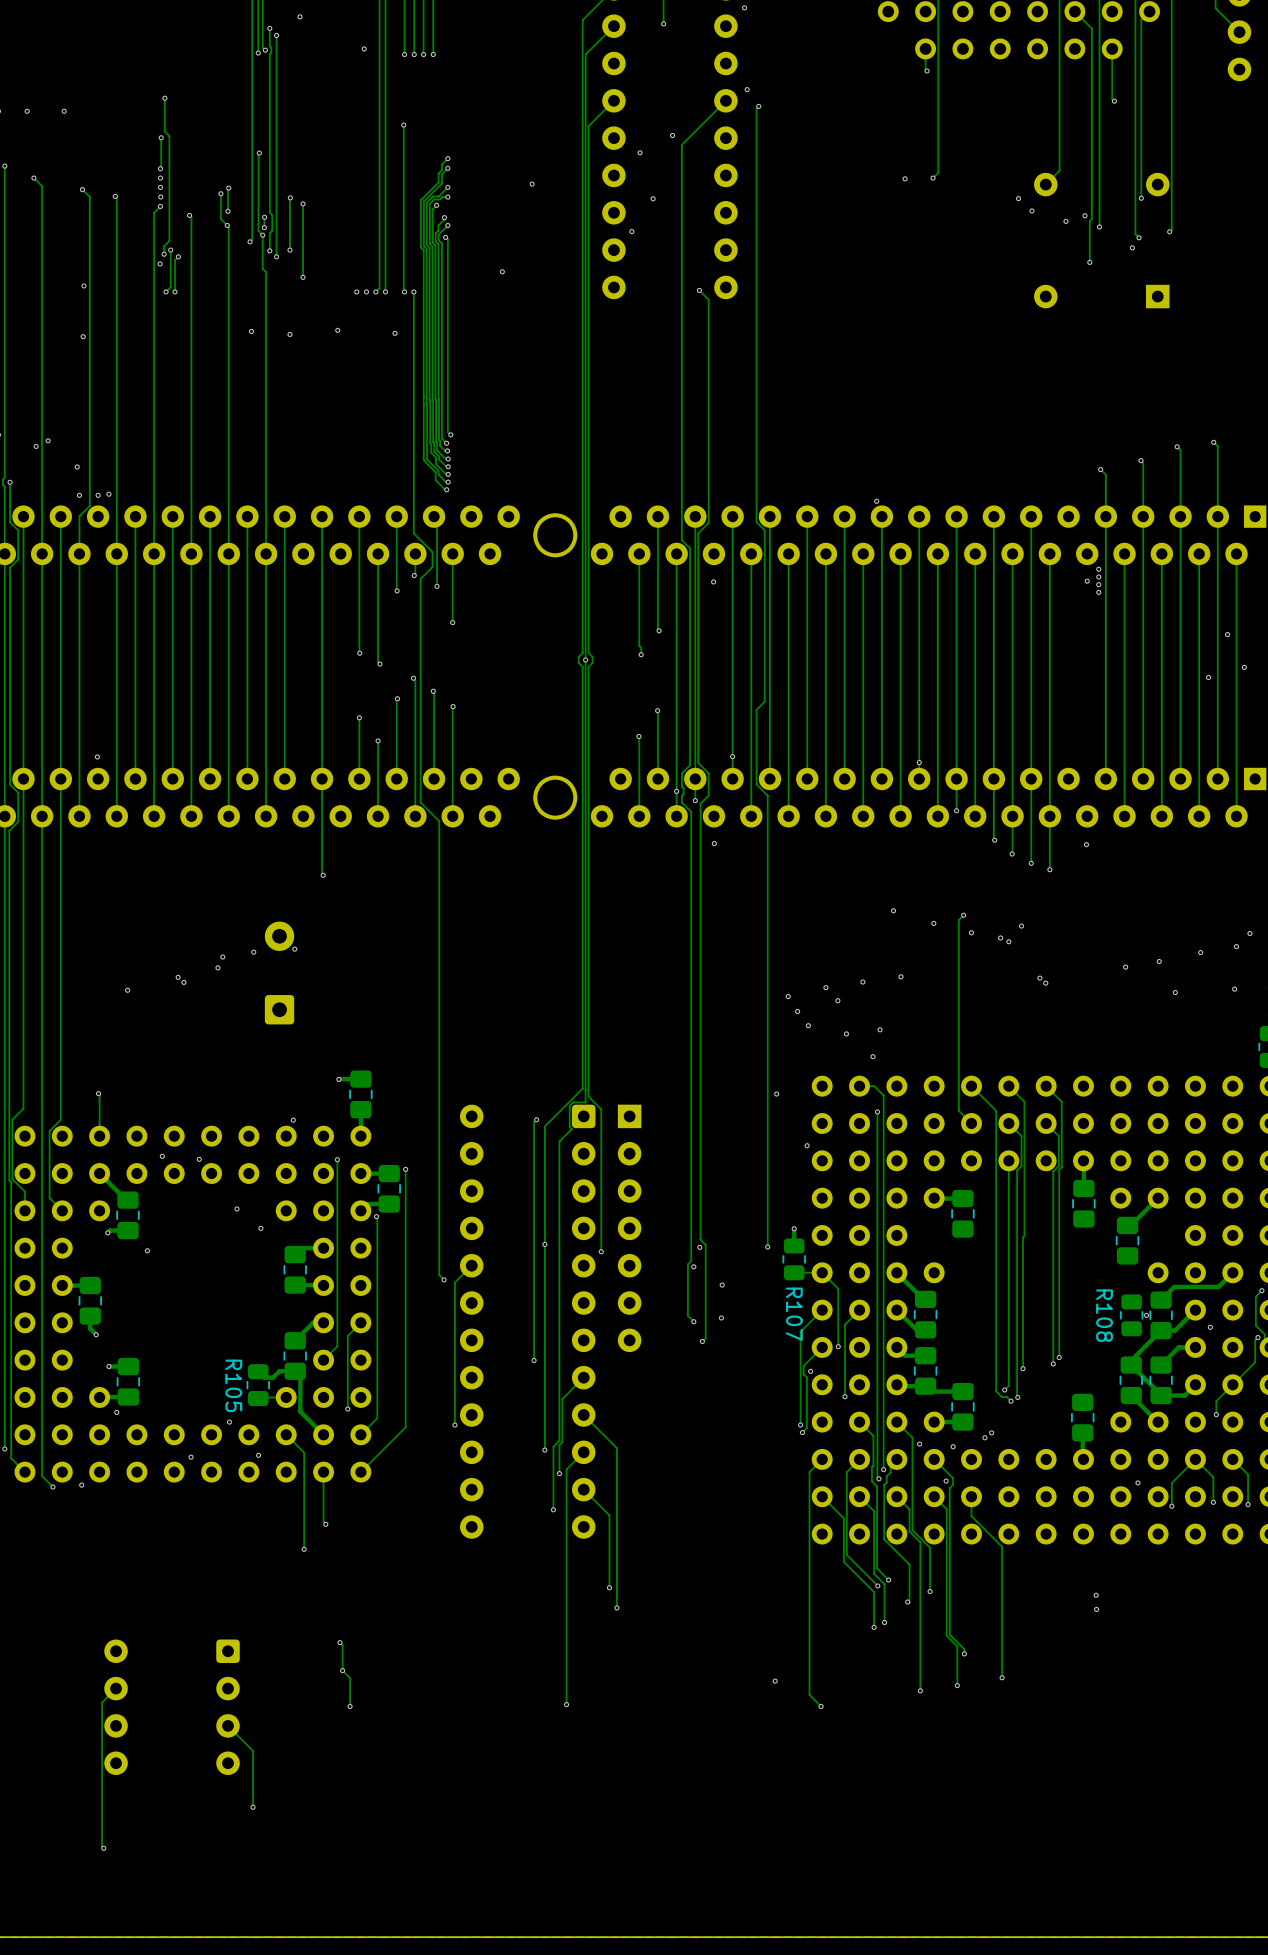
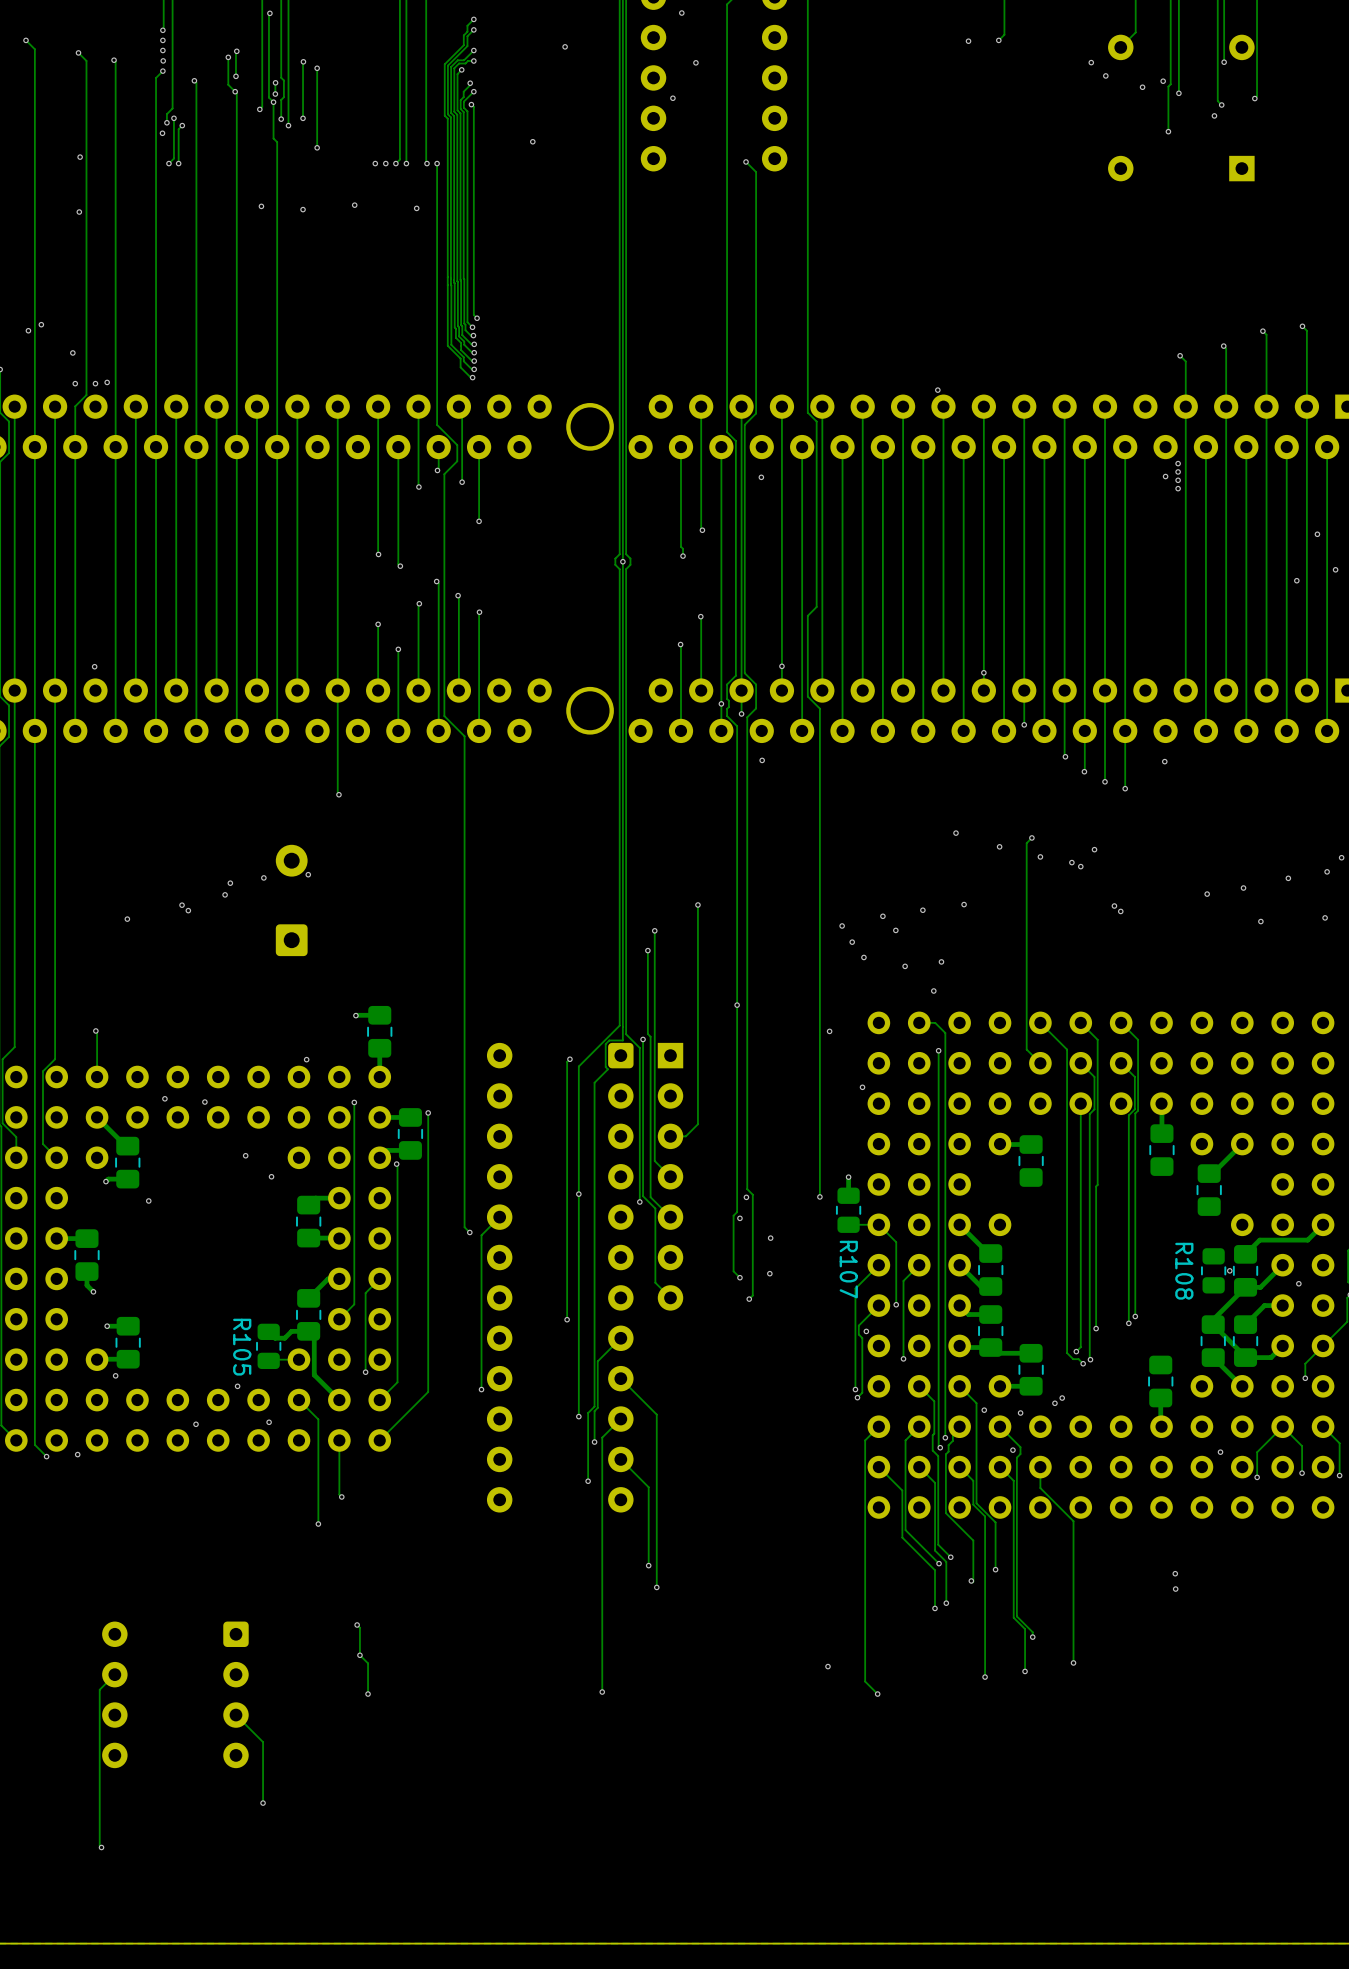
track: none -> (697, 904) (697, 1124) (685, 1136) (670, 1136)
via: none -> (697, 904)
track: none -> (654, 930) (654, 1161) (670, 1176)
via: none -> (654, 930)
track: none -> (647, 950) (647, 1034) (650, 1036) (650, 1197) (670, 1217)
via: none -> (647, 950)
via: none -> (737, 1005)
track: none -> (643, 1039) (643, 1196) (655, 1208) (655, 1282) (670, 1297)
via: none -> (643, 1039)

